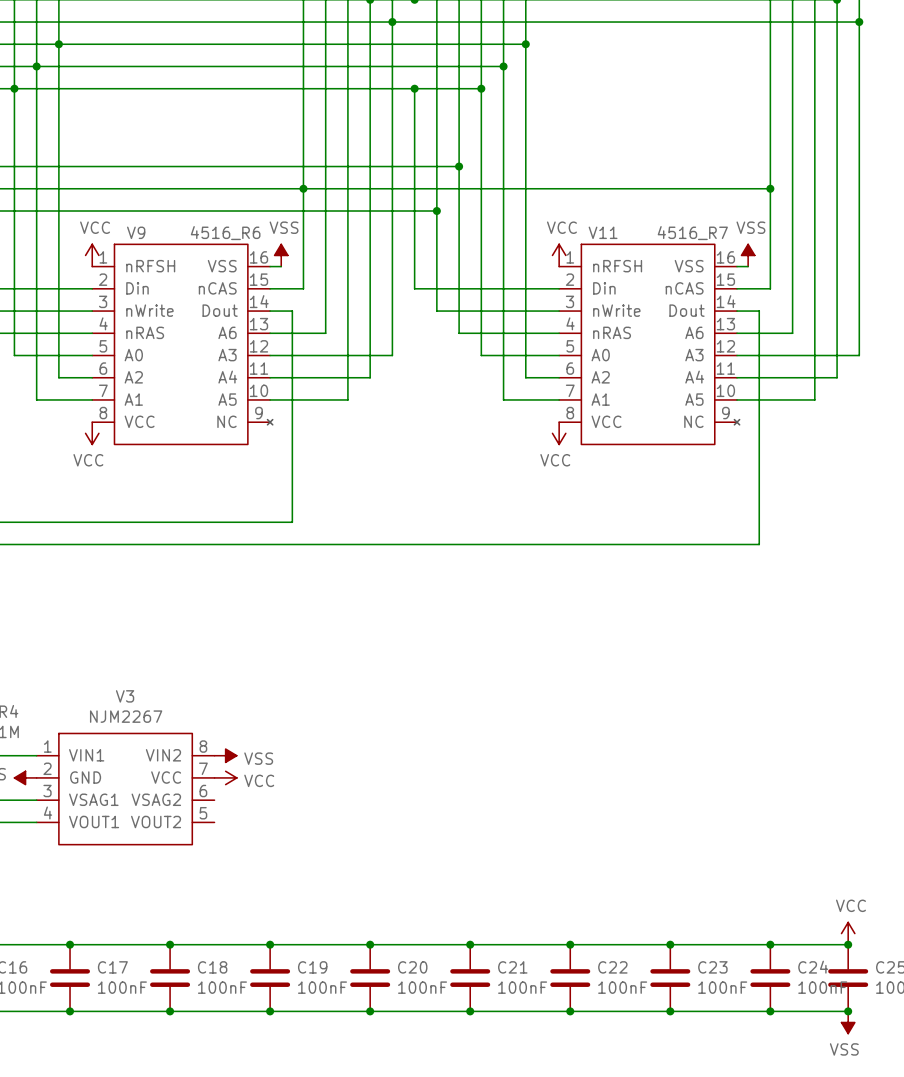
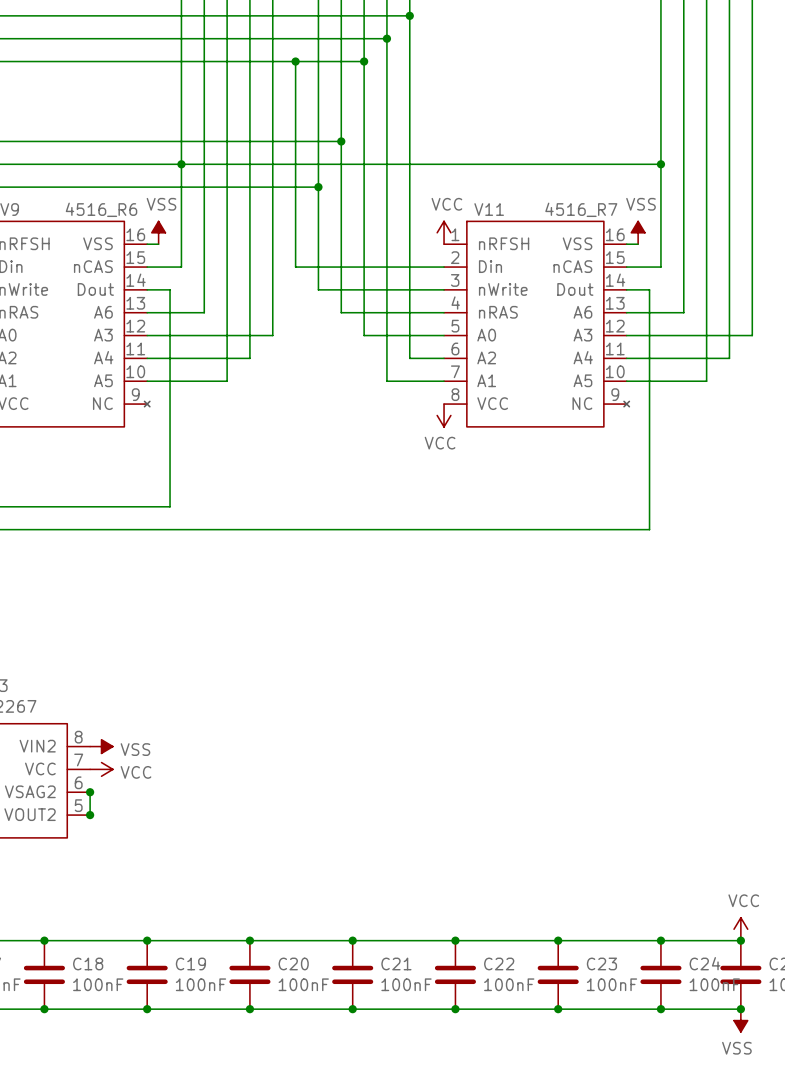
wire: none -> (90, 791) (88, 815)
junction: none -> (90, 792)
junction: none -> (90, 815)

